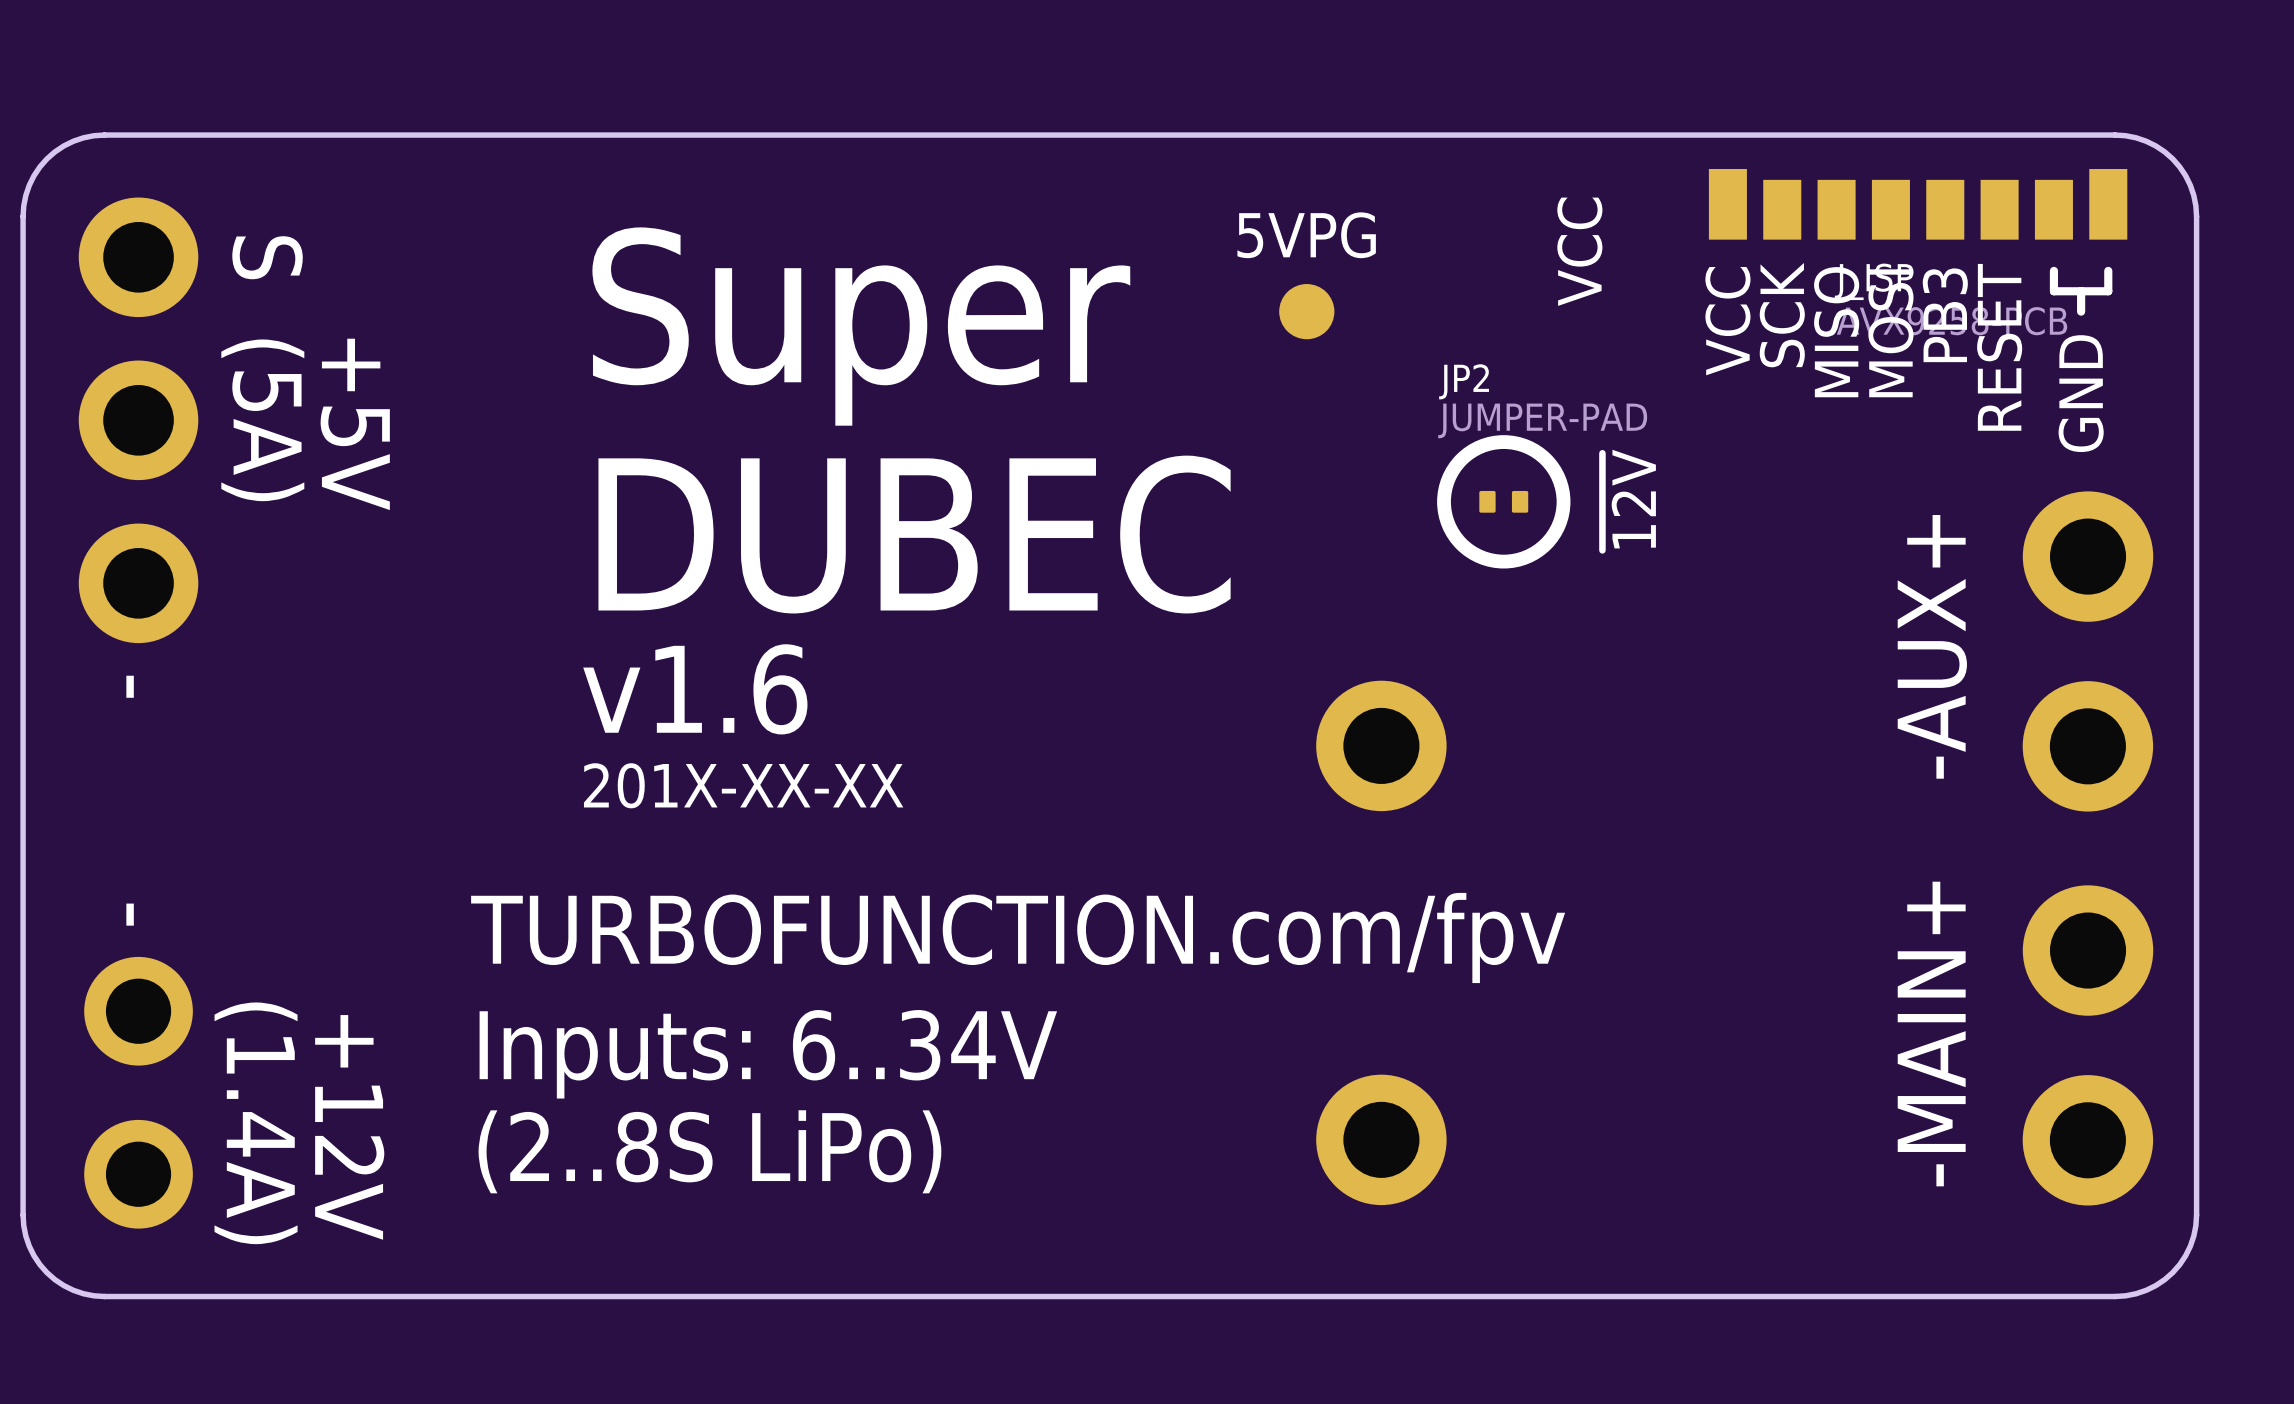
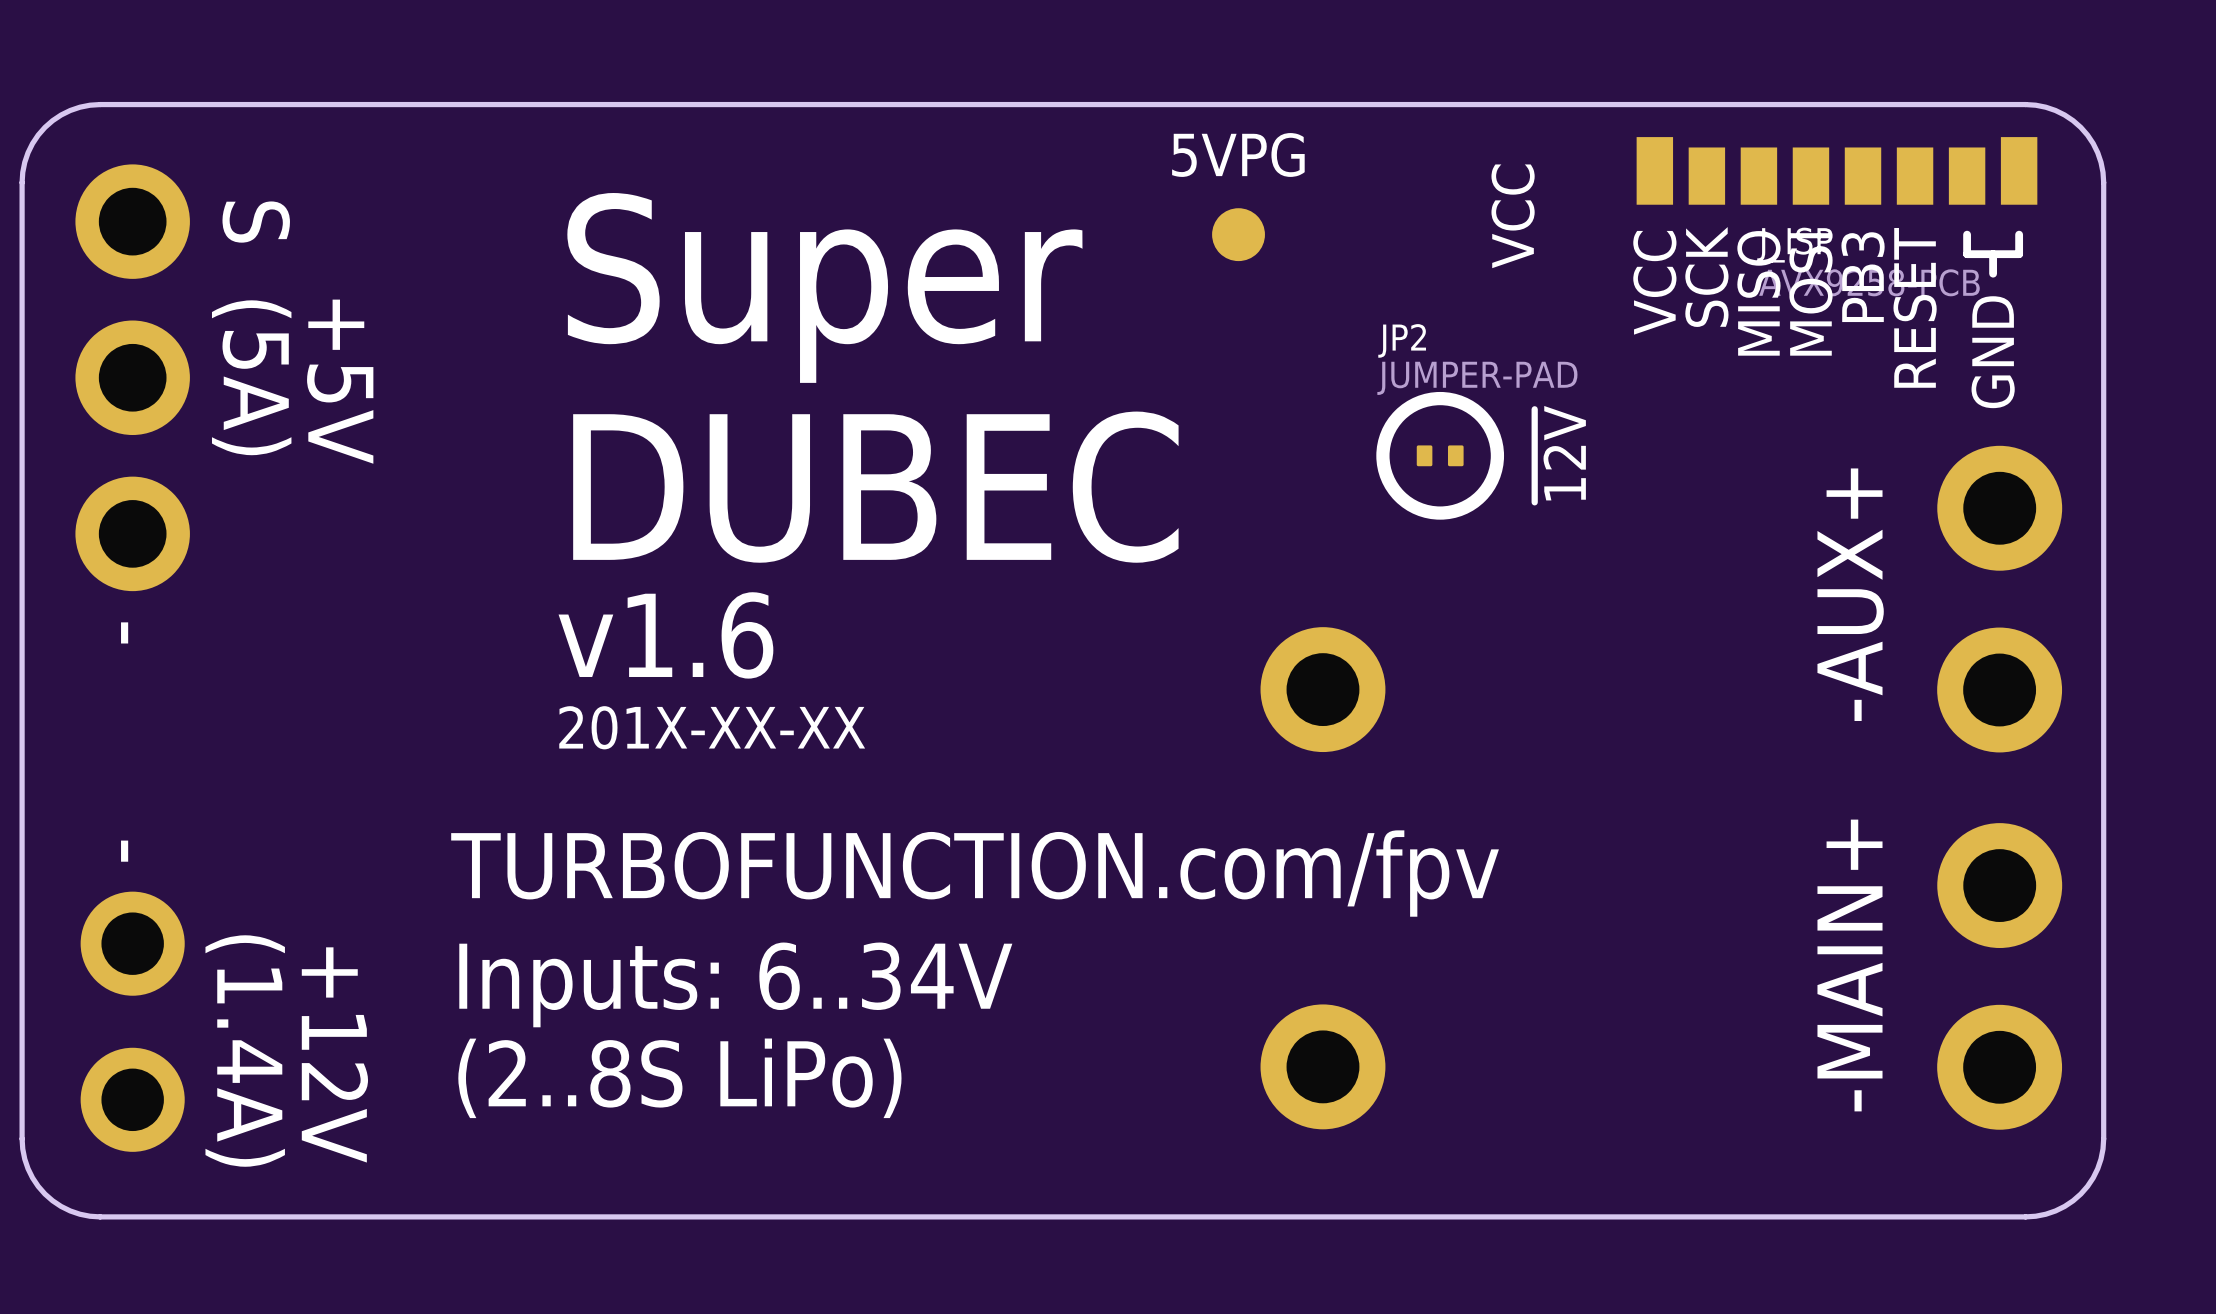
text position: 5VPG (1306, 235) -> 5VPG (1238, 154)
part position: (1306, 311) -> (1238, 234)

